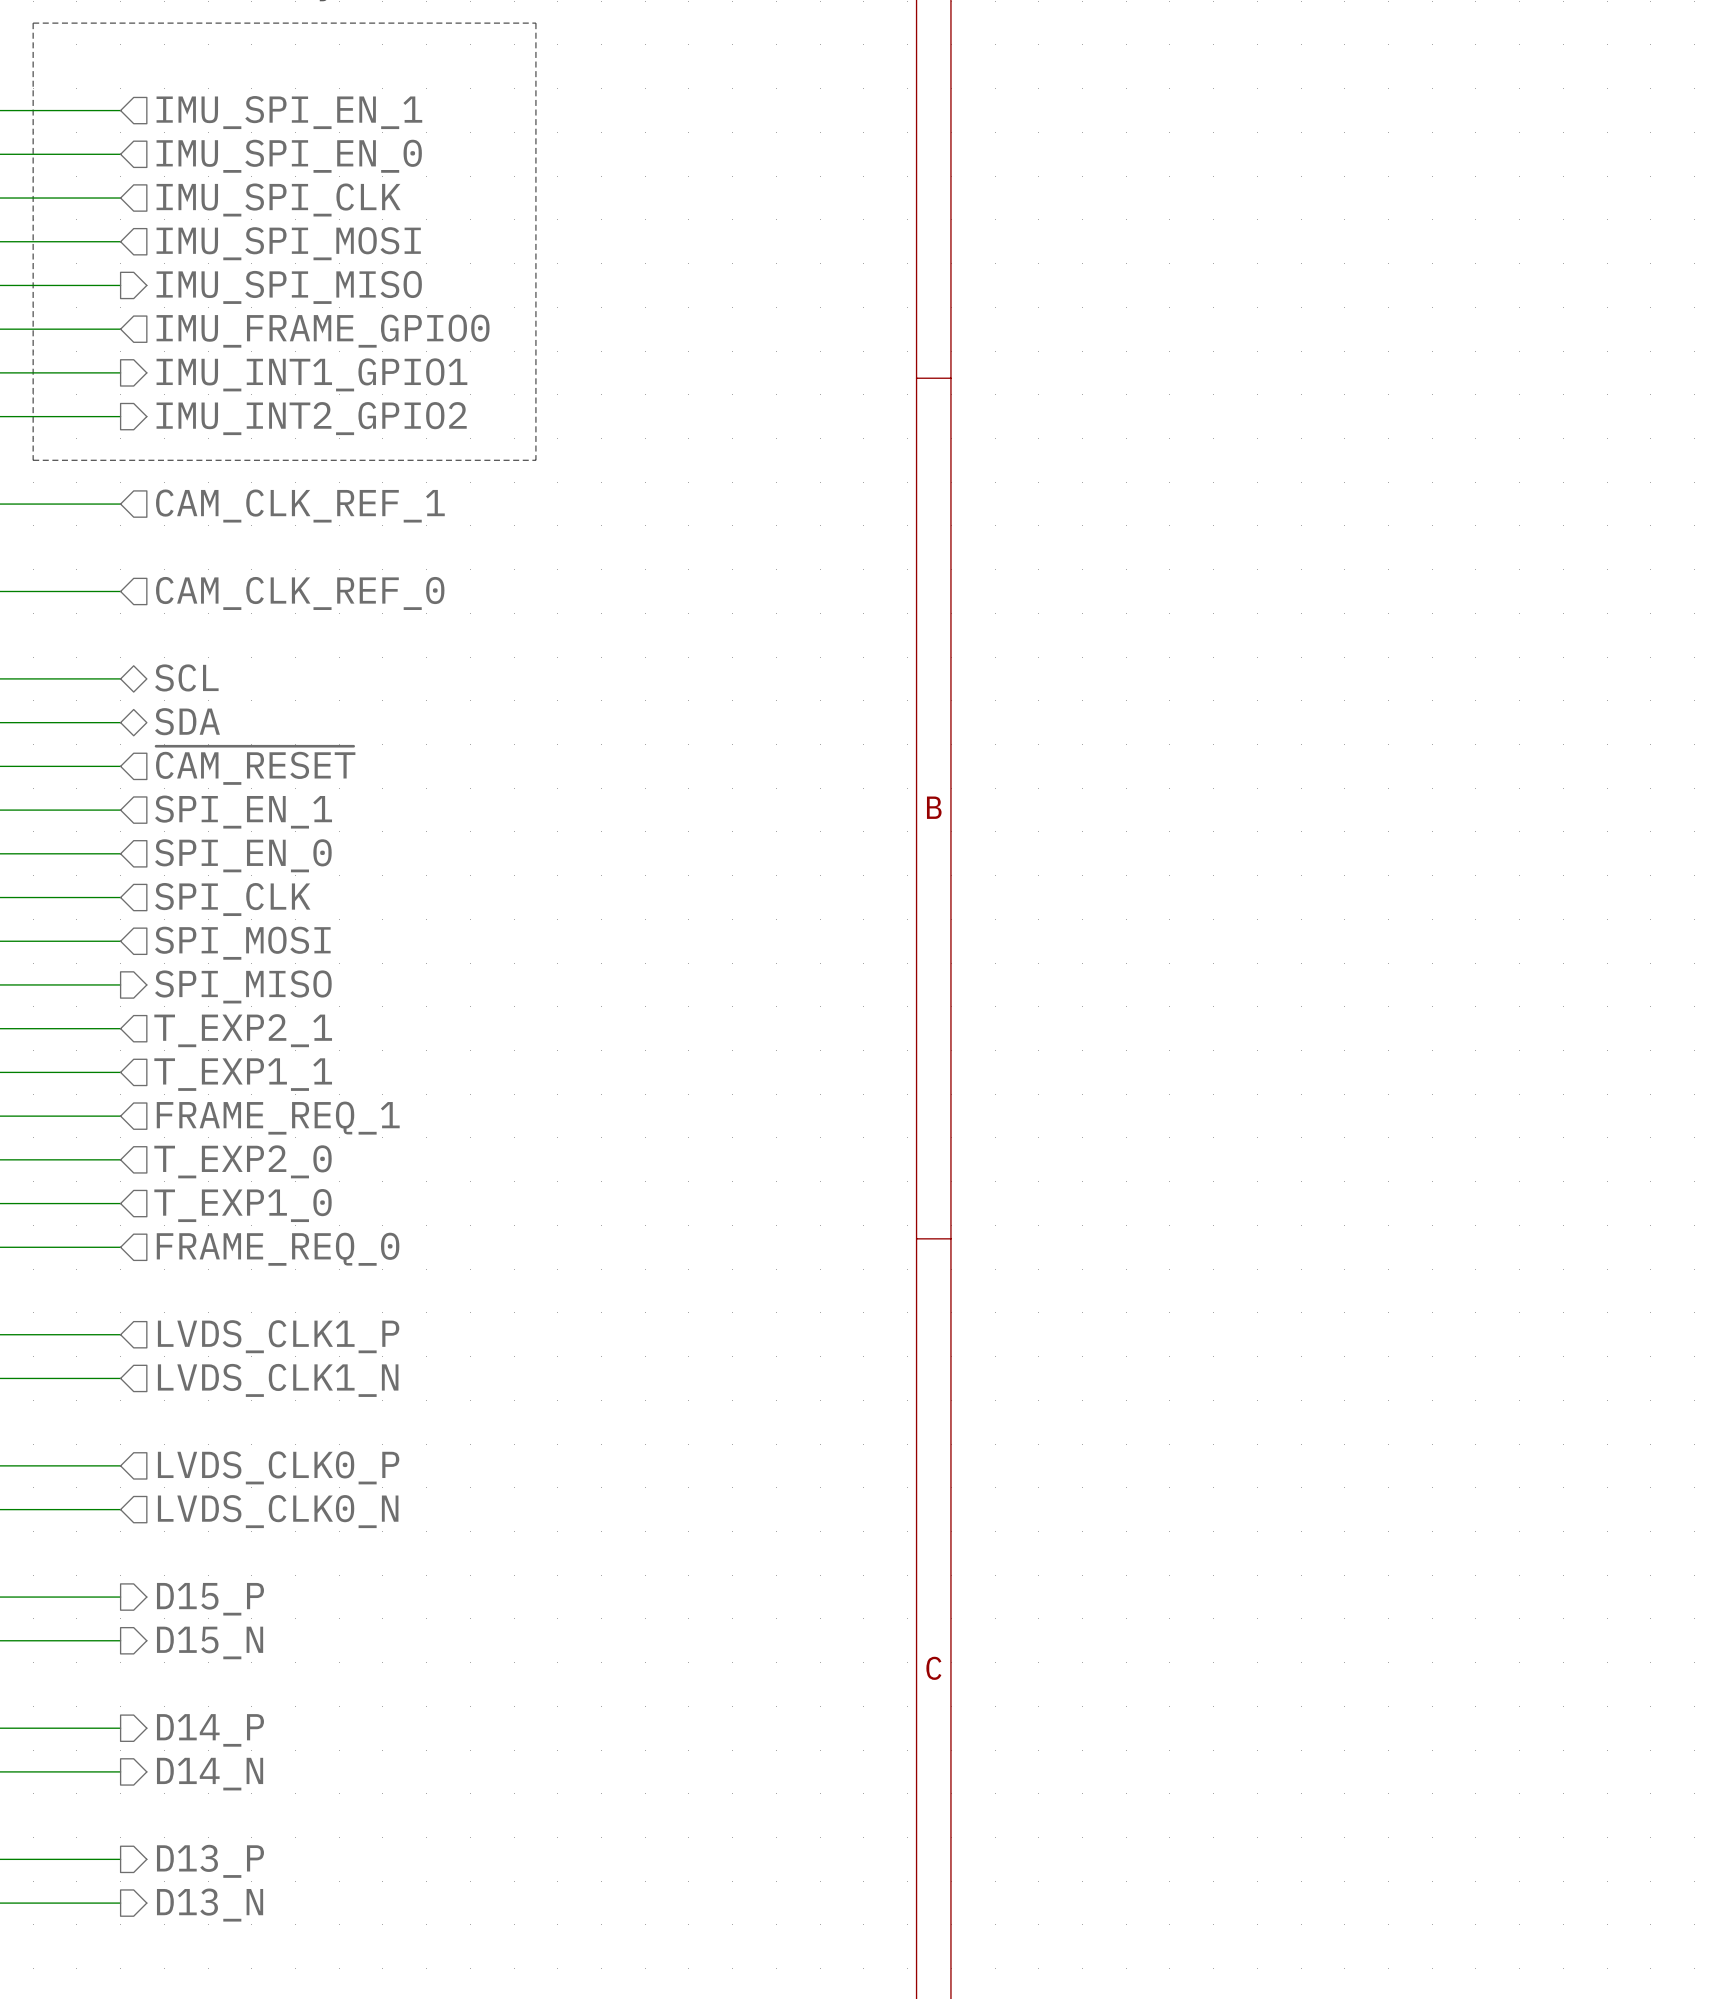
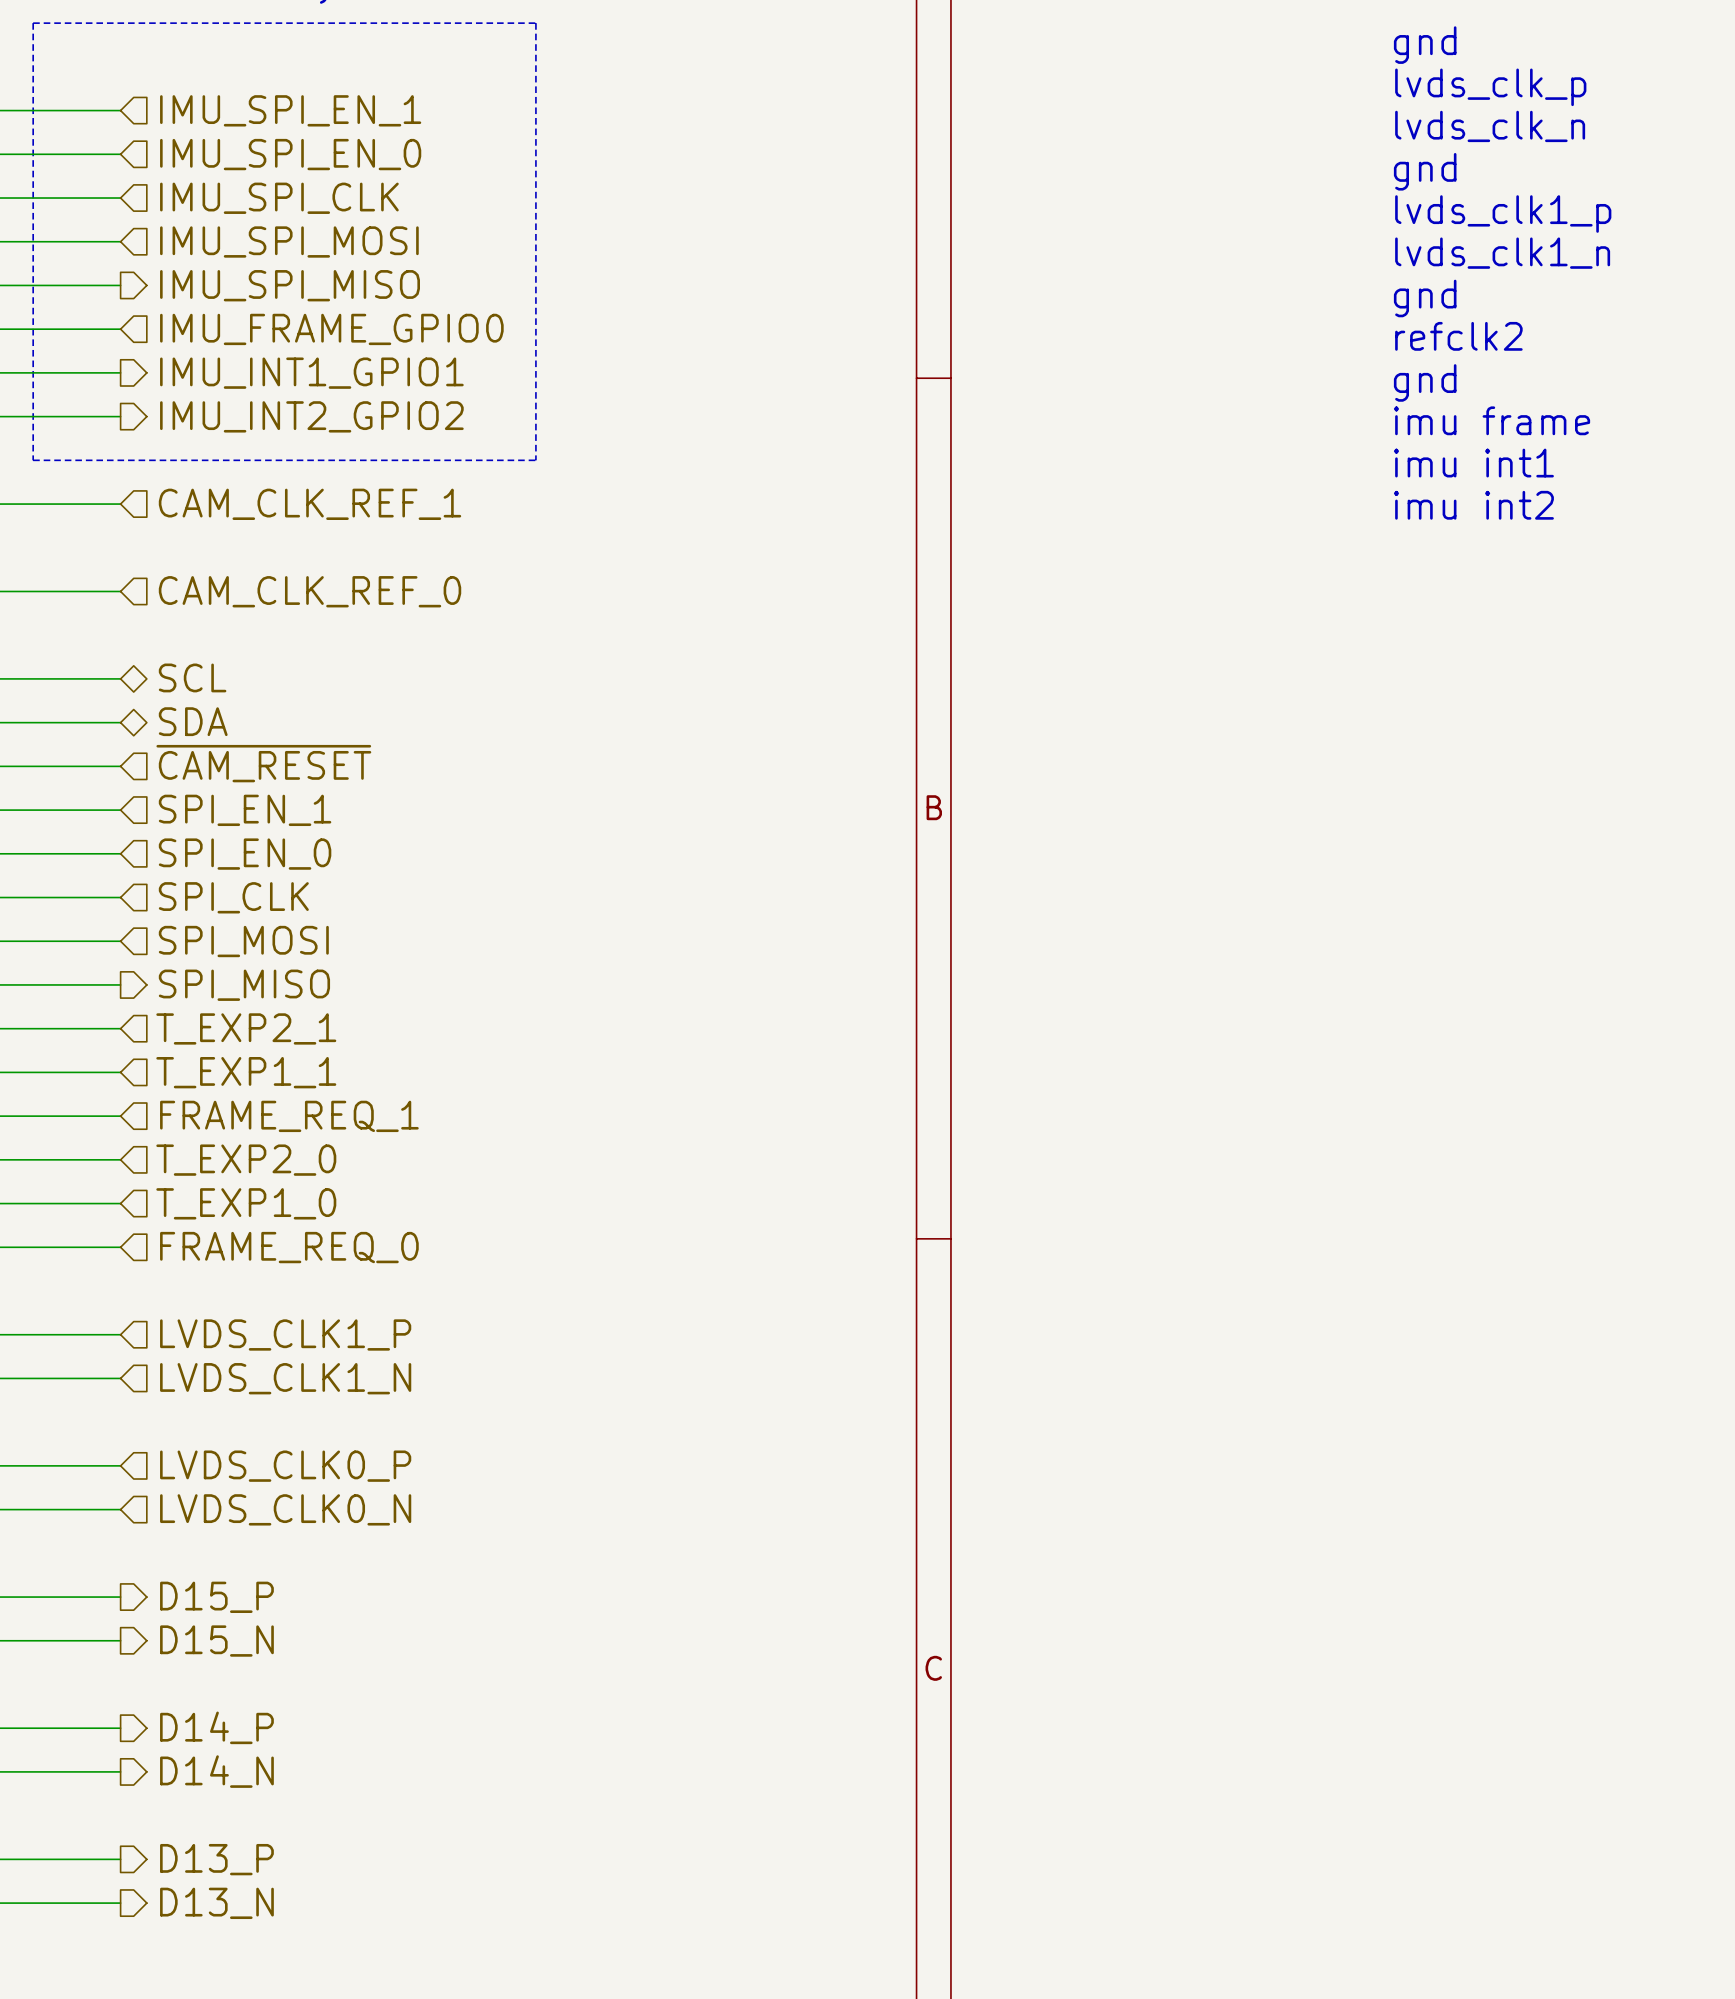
text: none -> gnd (1425, 45)
text: none -> lvds_clk_p (1490, 87)
text: none -> lvds_clk_n (1490, 126)
text: none -> gnd (1425, 171)
text: none -> lvds_clk1_p (1503, 214)
text: none -> lvds_clk1_n (1502, 253)
text: none -> gnd (1425, 298)
text: none -> refclk2 (1458, 336)
text: none -> gnd (1425, 382)
text: none -> imu frame (1492, 420)
text: none -> imu int1 (1473, 463)
text: none -> imu int2 (1473, 505)

